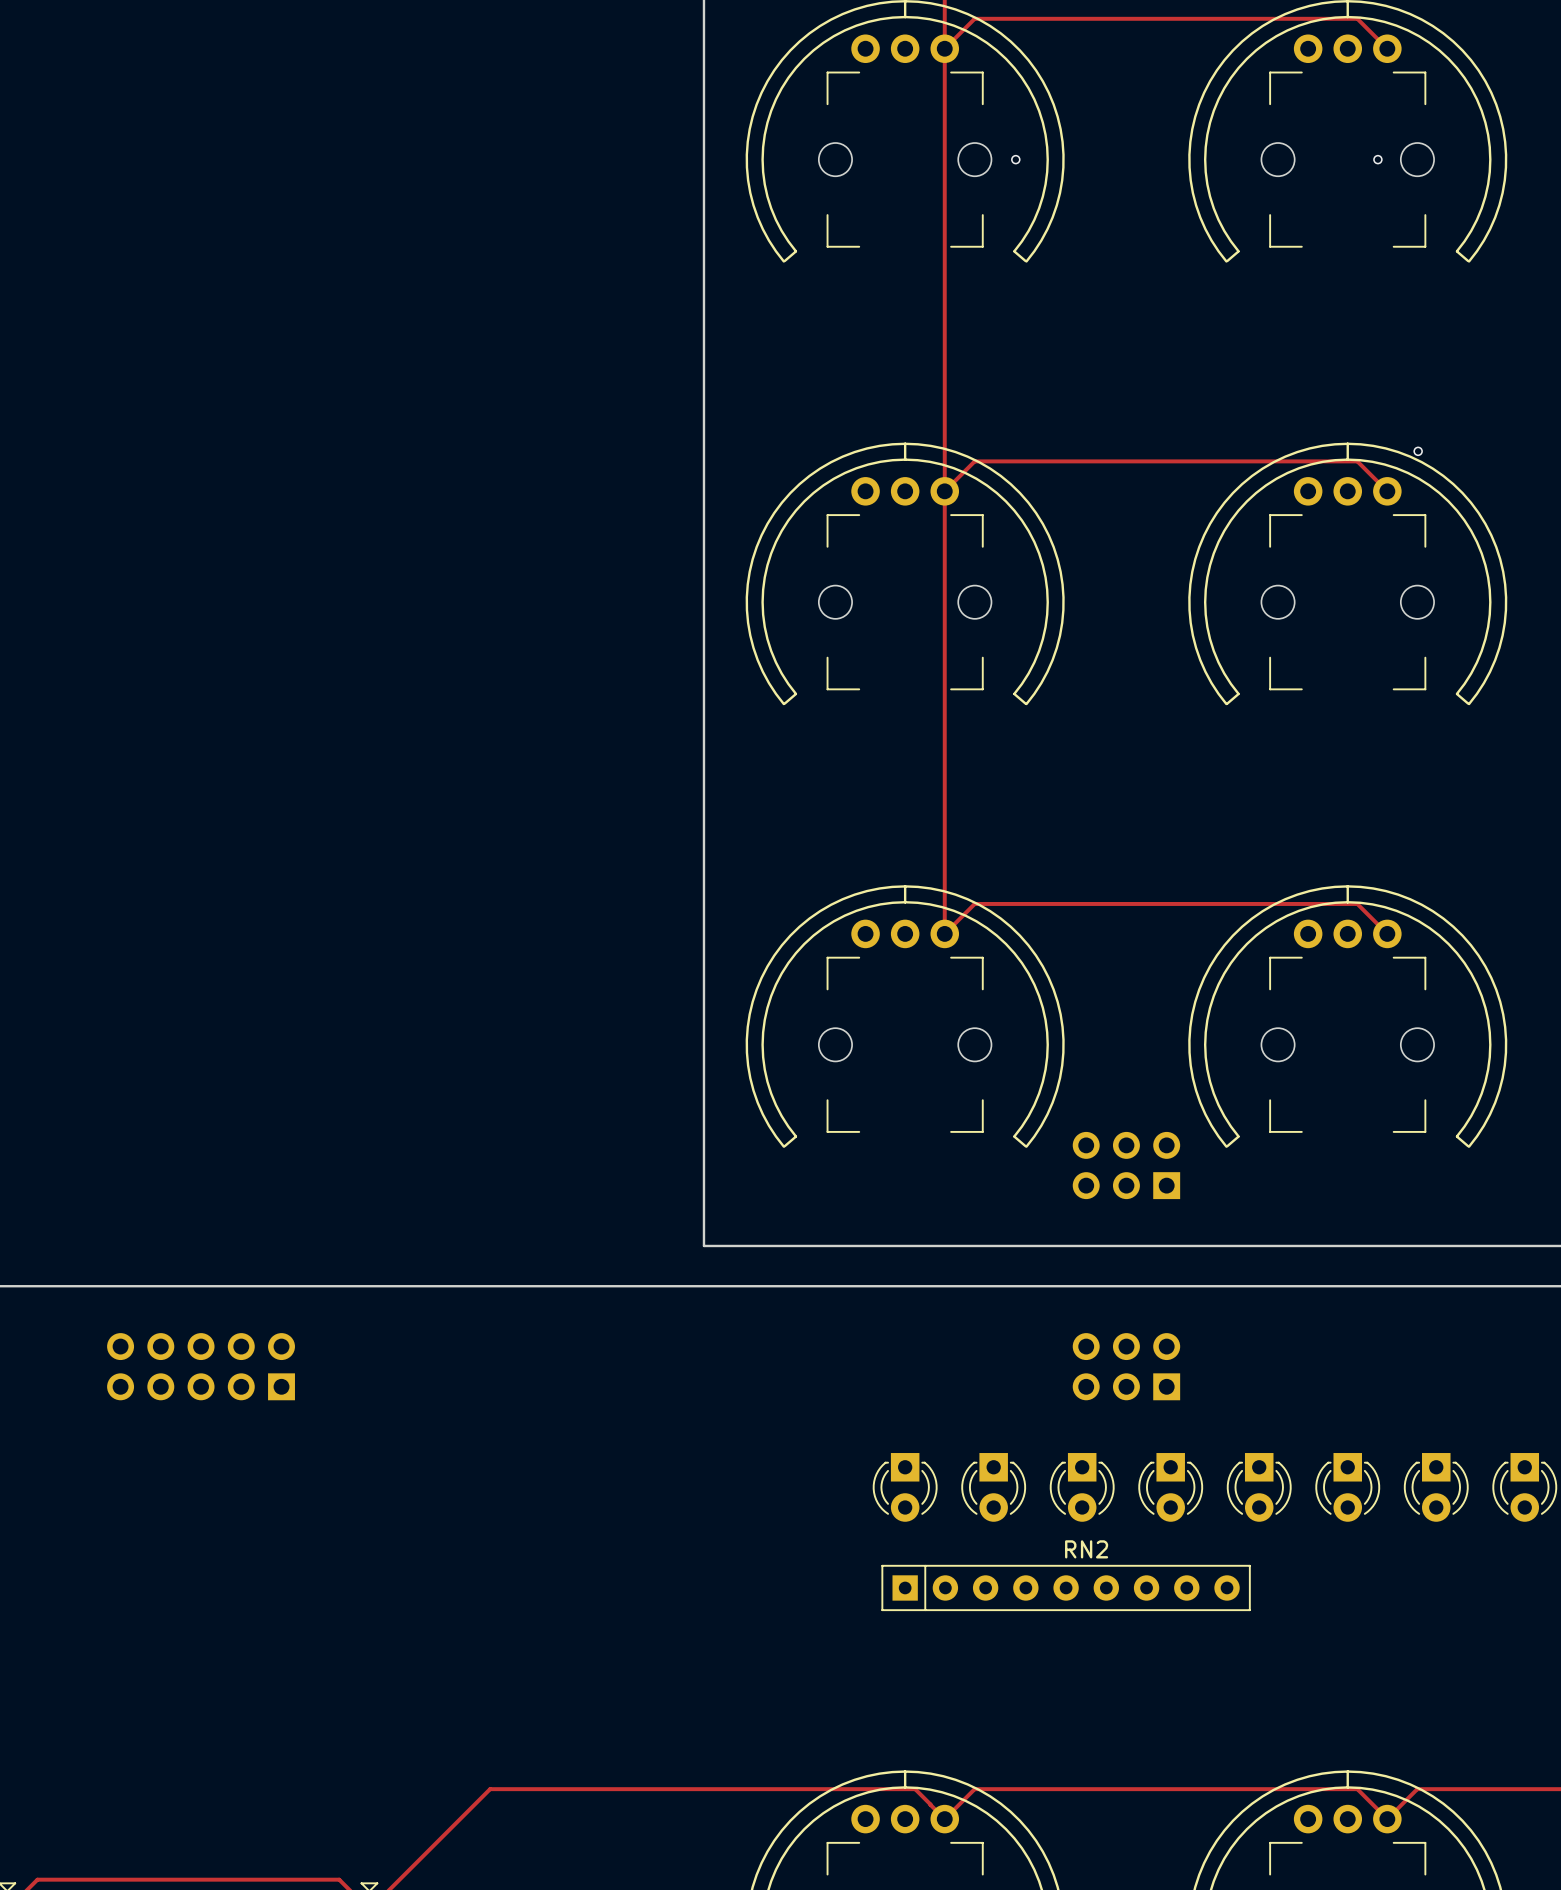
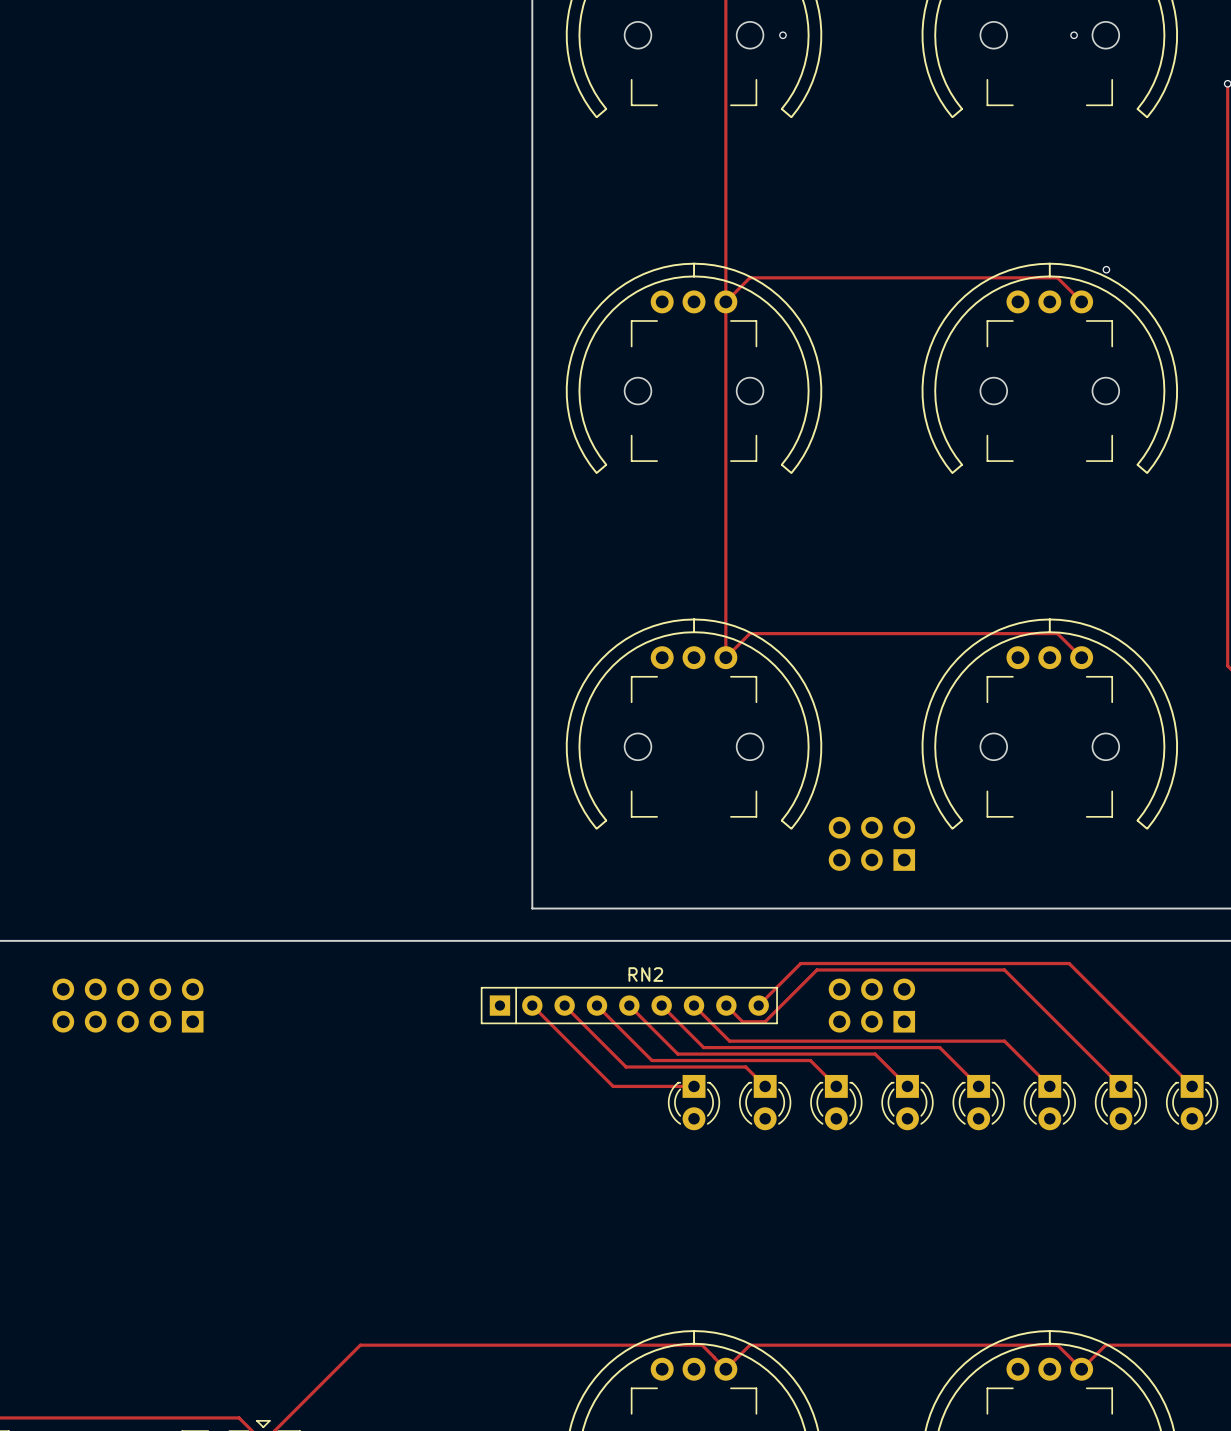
track: none -> (532, 1005) (613, 1086) (694, 1086)
track: none -> (564, 1005) (626, 1067) (745, 1067) (765, 1086)
track: none -> (596, 1005) (651, 1060) (810, 1060) (836, 1086)
track: none -> (629, 1005) (677, 1054) (875, 1054) (907, 1086)
track: none -> (661, 1005) (703, 1047) (939, 1047) (978, 1086)
track: none -> (694, 1005) (729, 1041) (1004, 1041) (1049, 1086)
track: none -> (726, 1005) (742, 1021) (765, 1021) (816, 969) (1004, 969) (1120, 1086)
track: none -> (758, 1005) (800, 963) (1069, 963) (1192, 1086)
RN2 position: (1066, 1587) -> (629, 1005)

